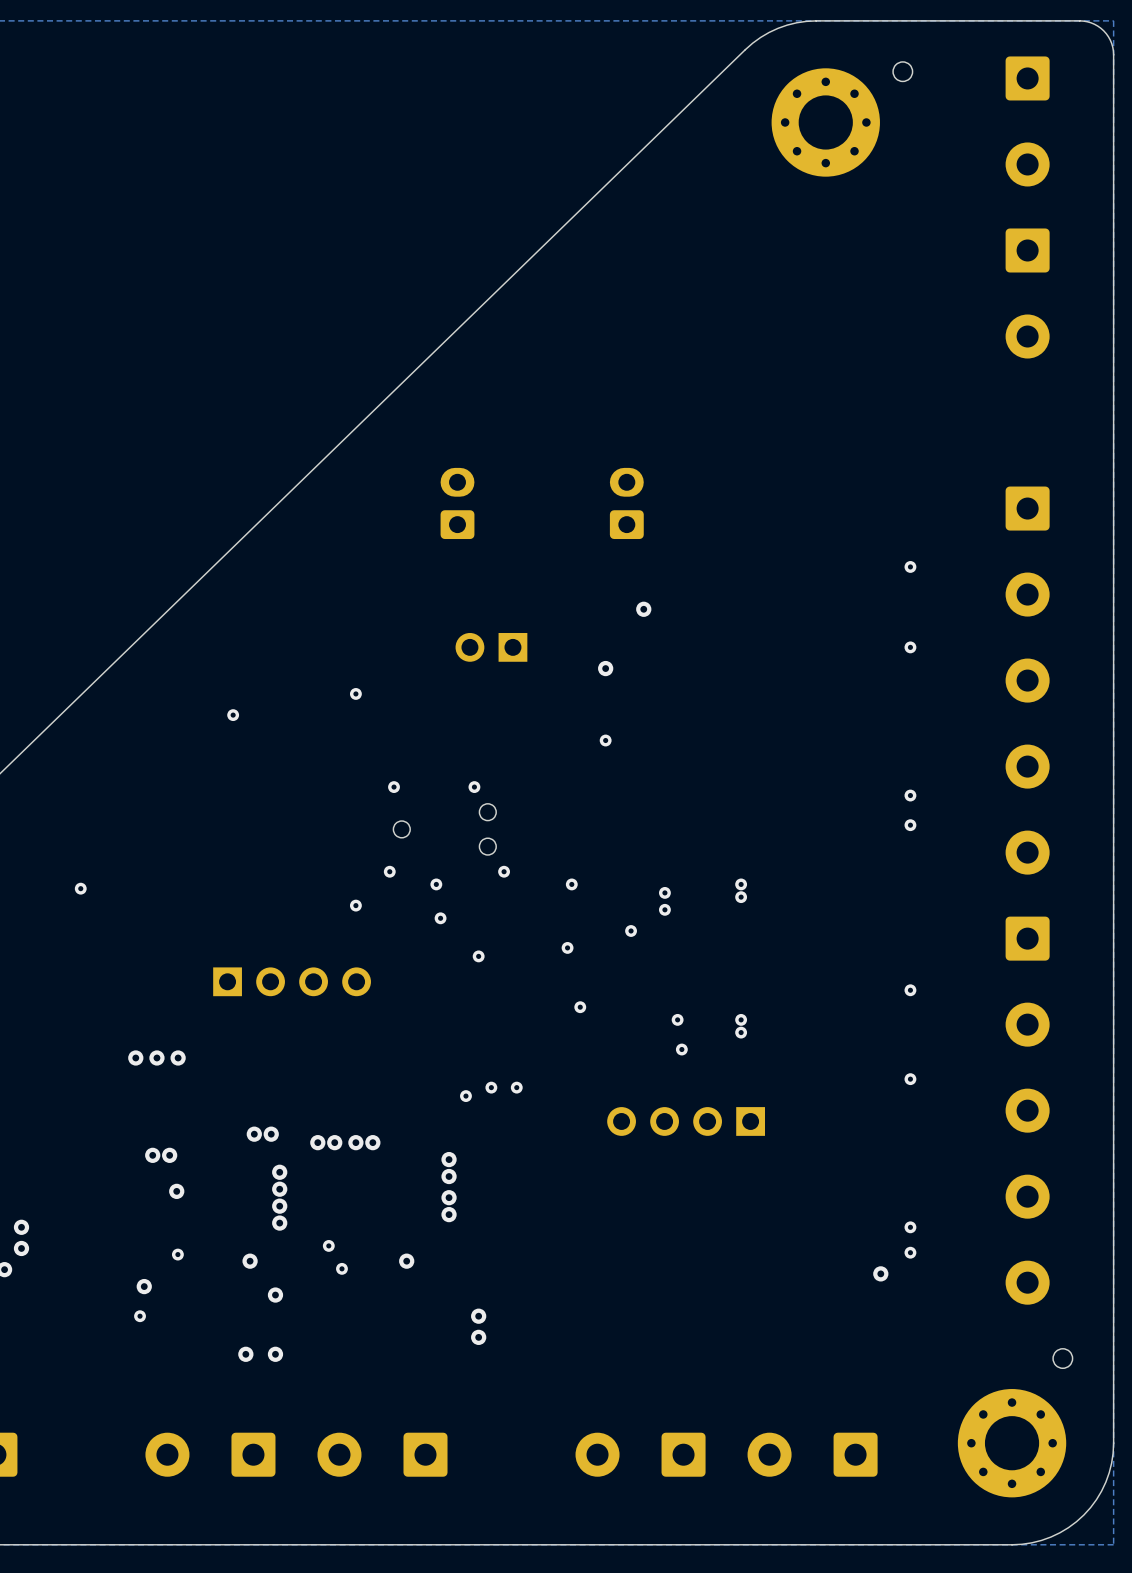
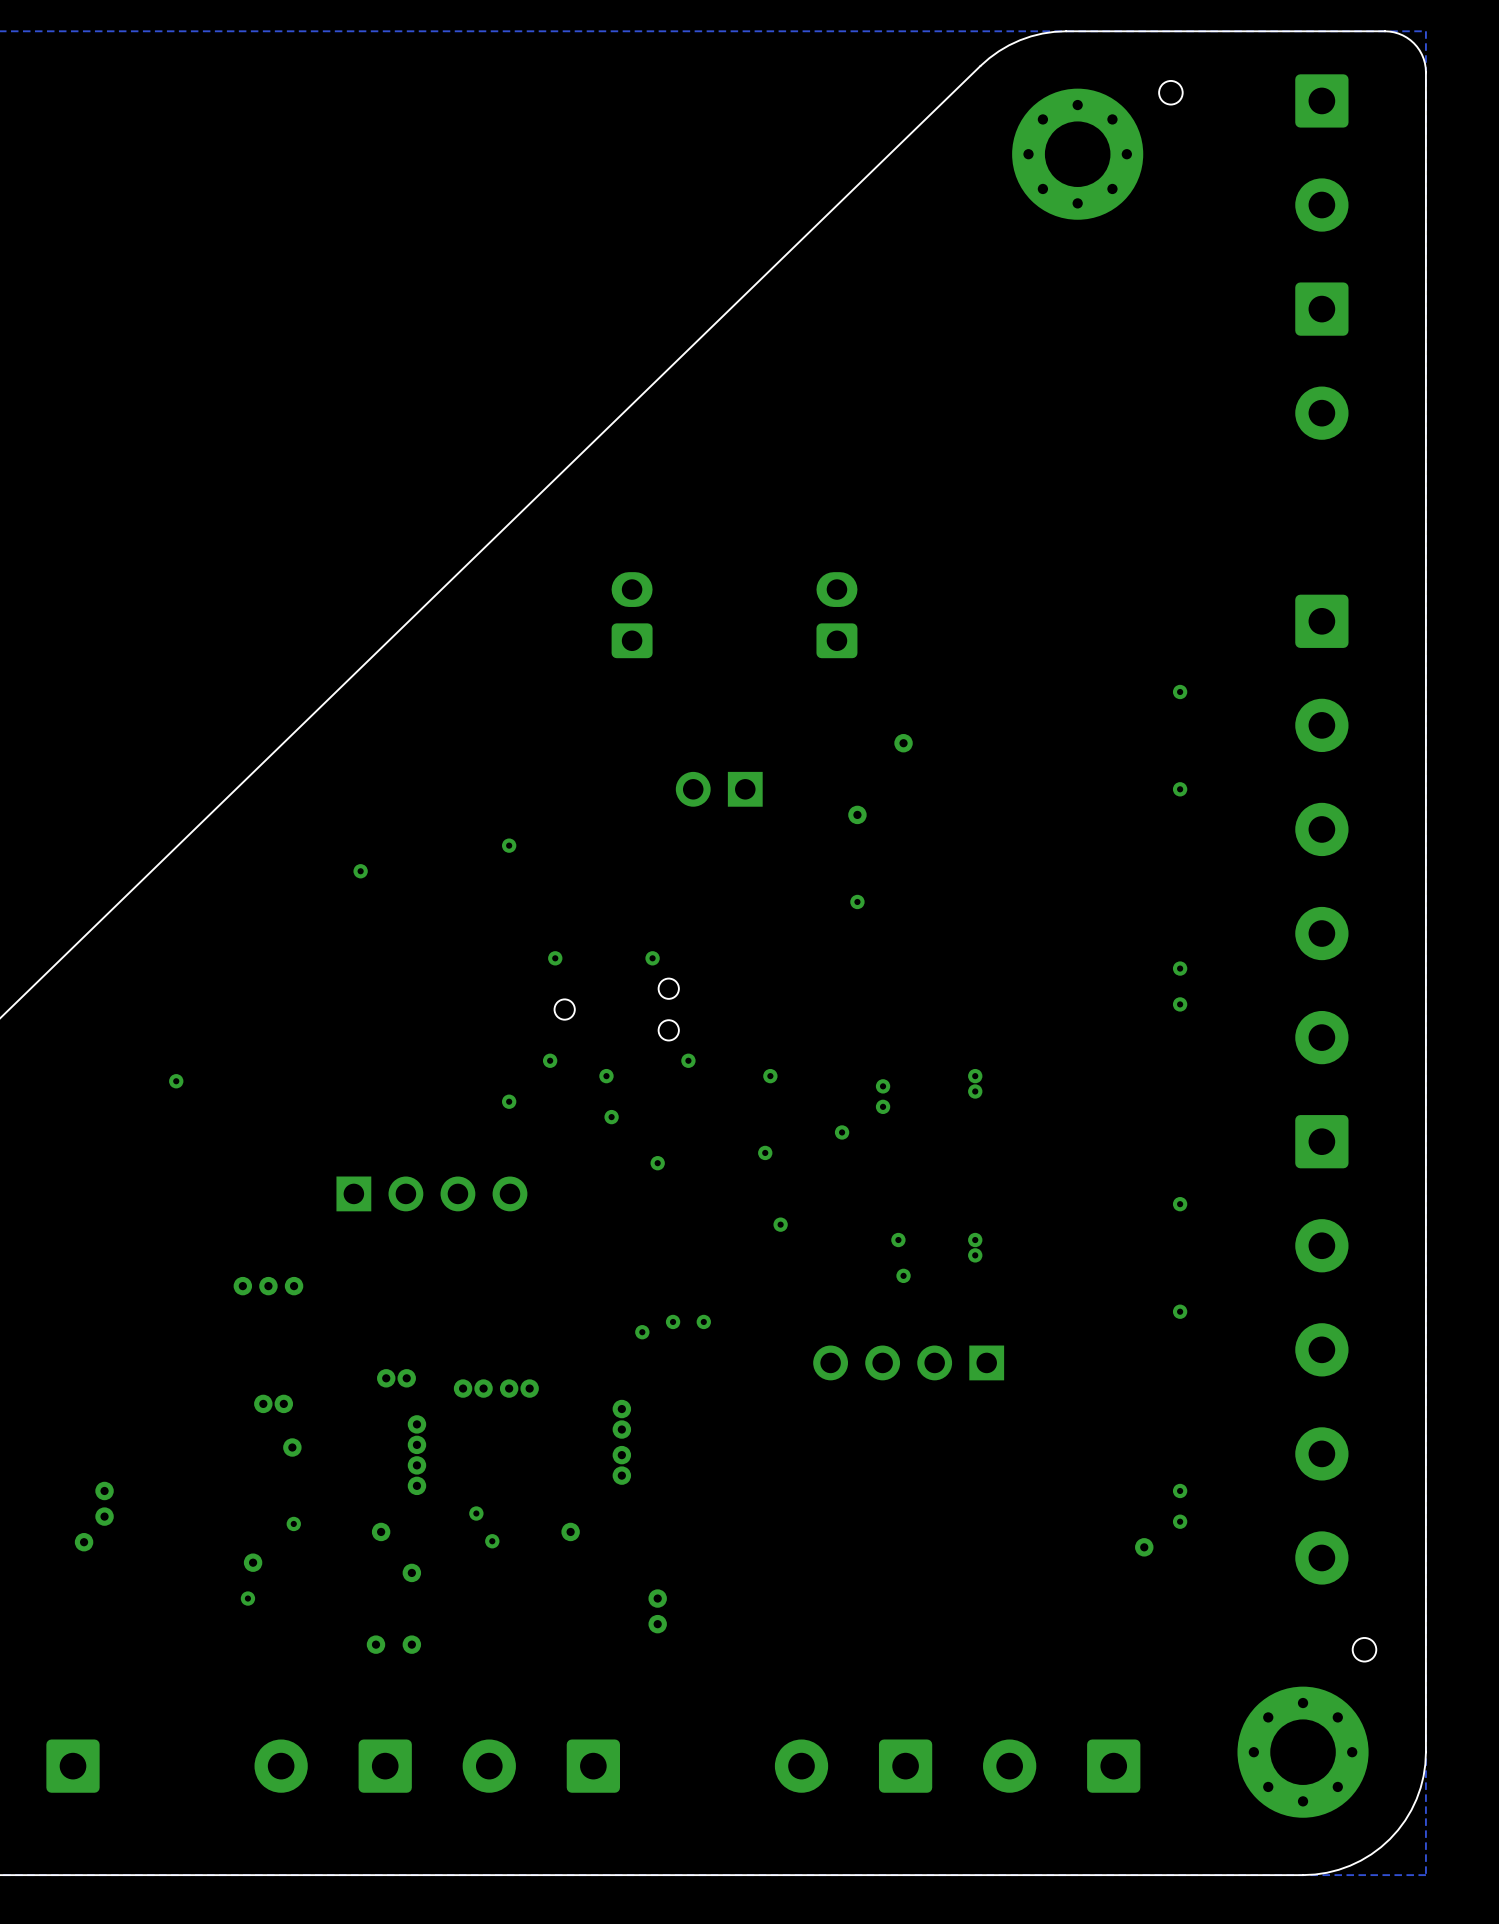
via: (643, 609) -> none
via: none -> (903, 743)
part position: (491, 647) -> (719, 789)
via: (605, 668) -> none
via: none -> (857, 814)
via position: (605, 740) -> (857, 901)

